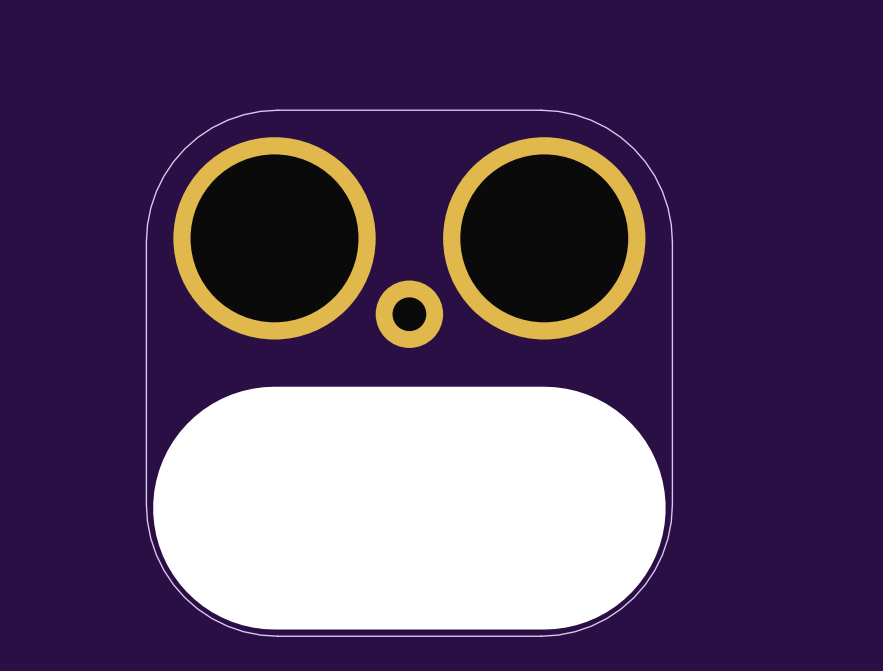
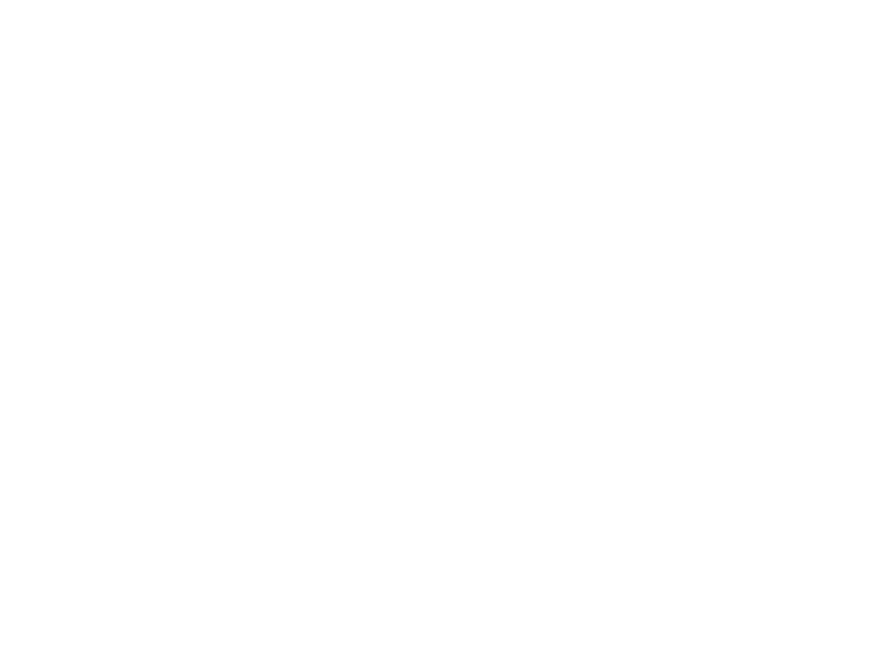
part: (409, 373) -> none

